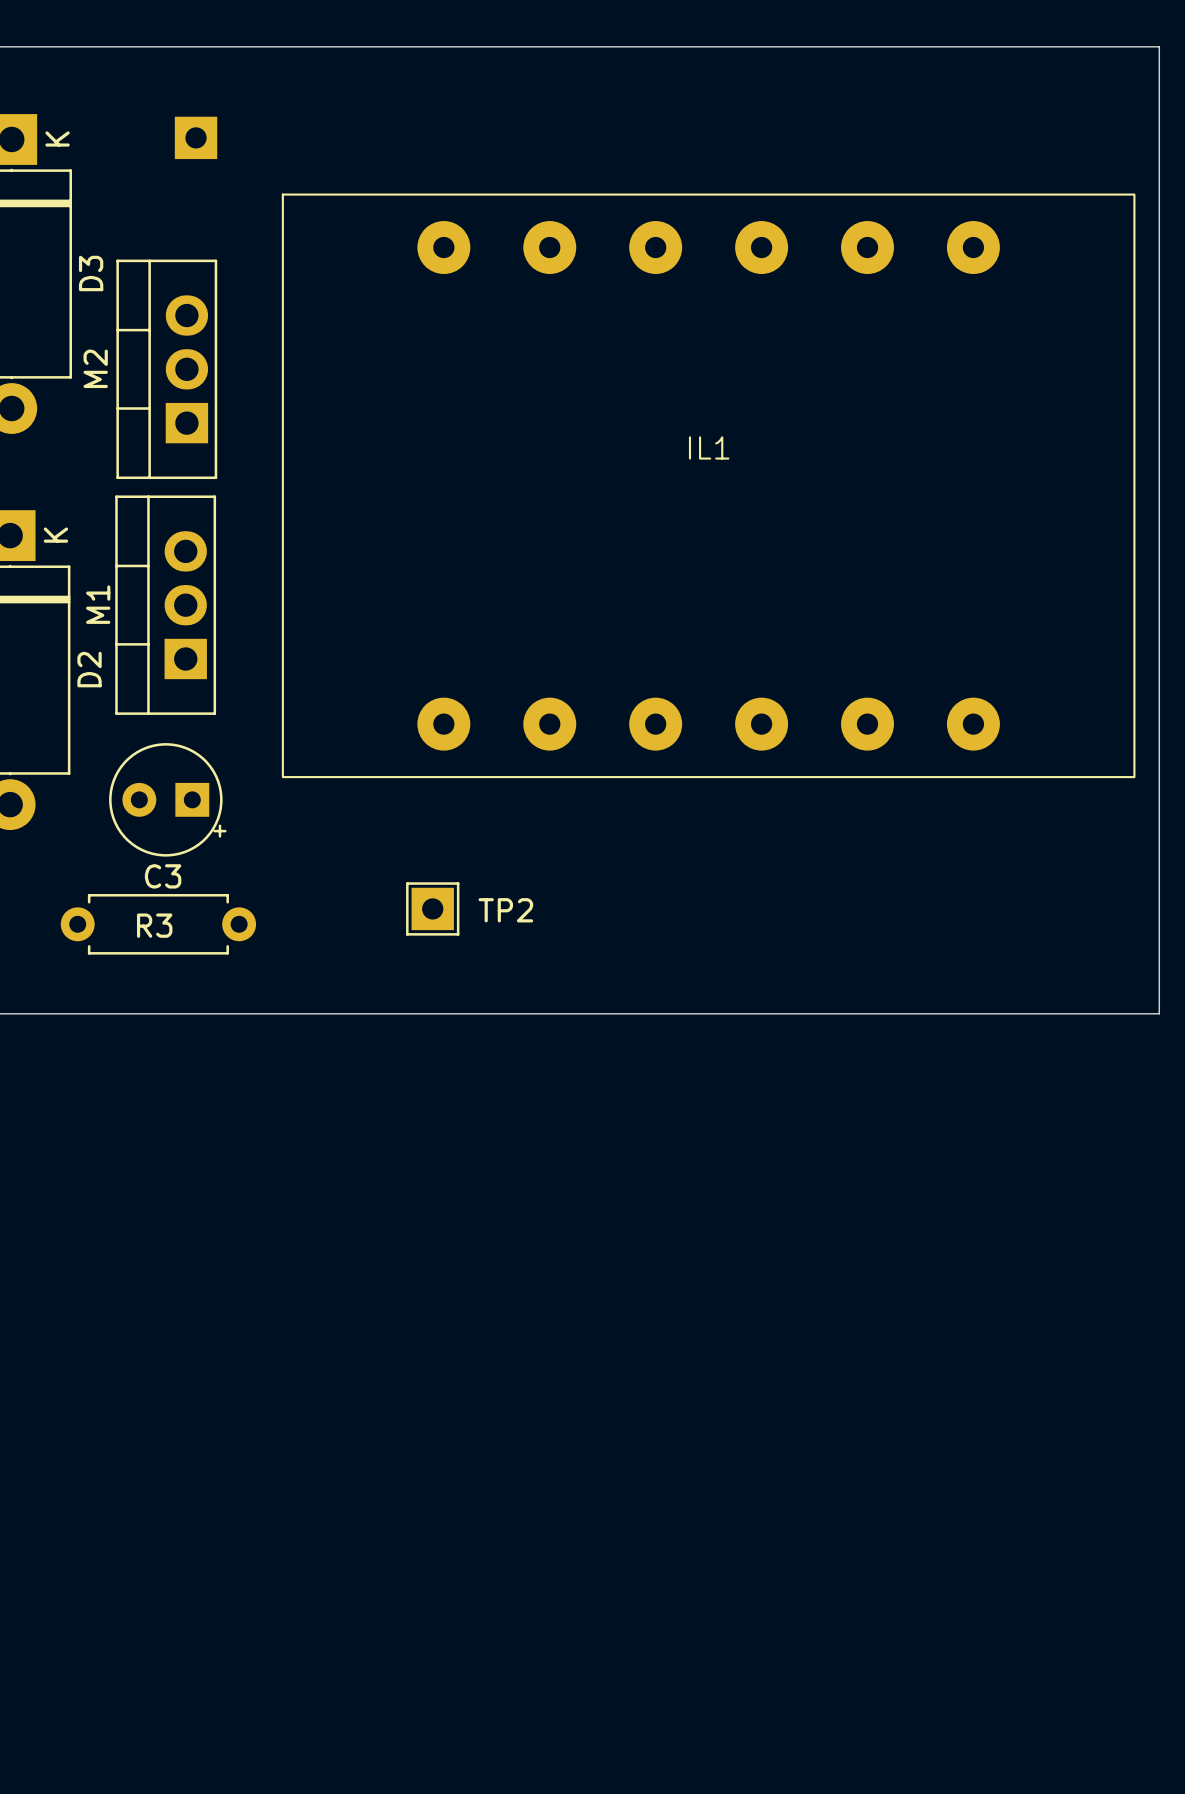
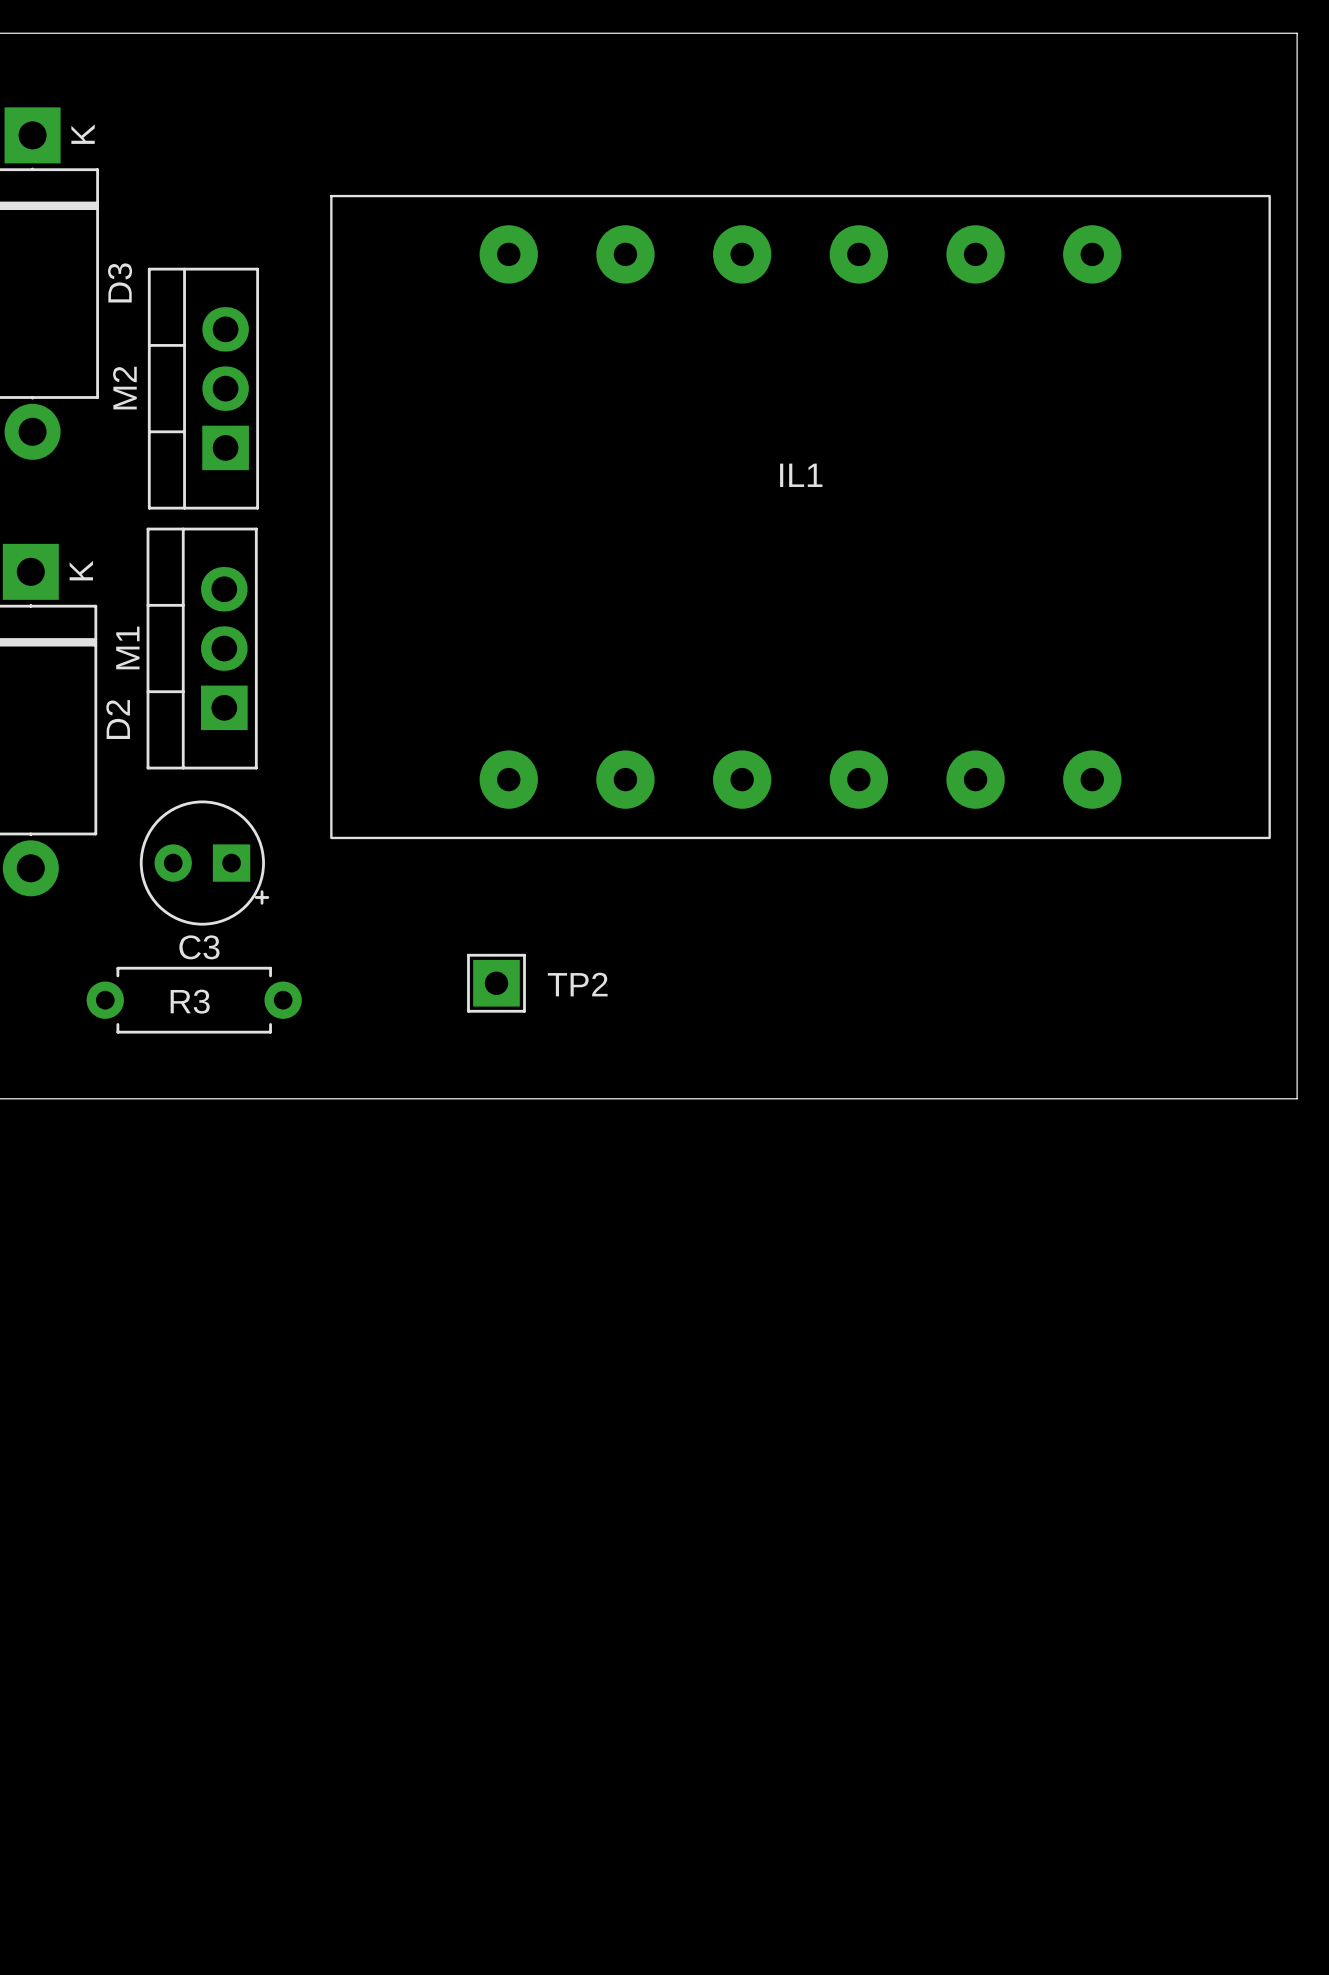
part: (196, 137) -> none

